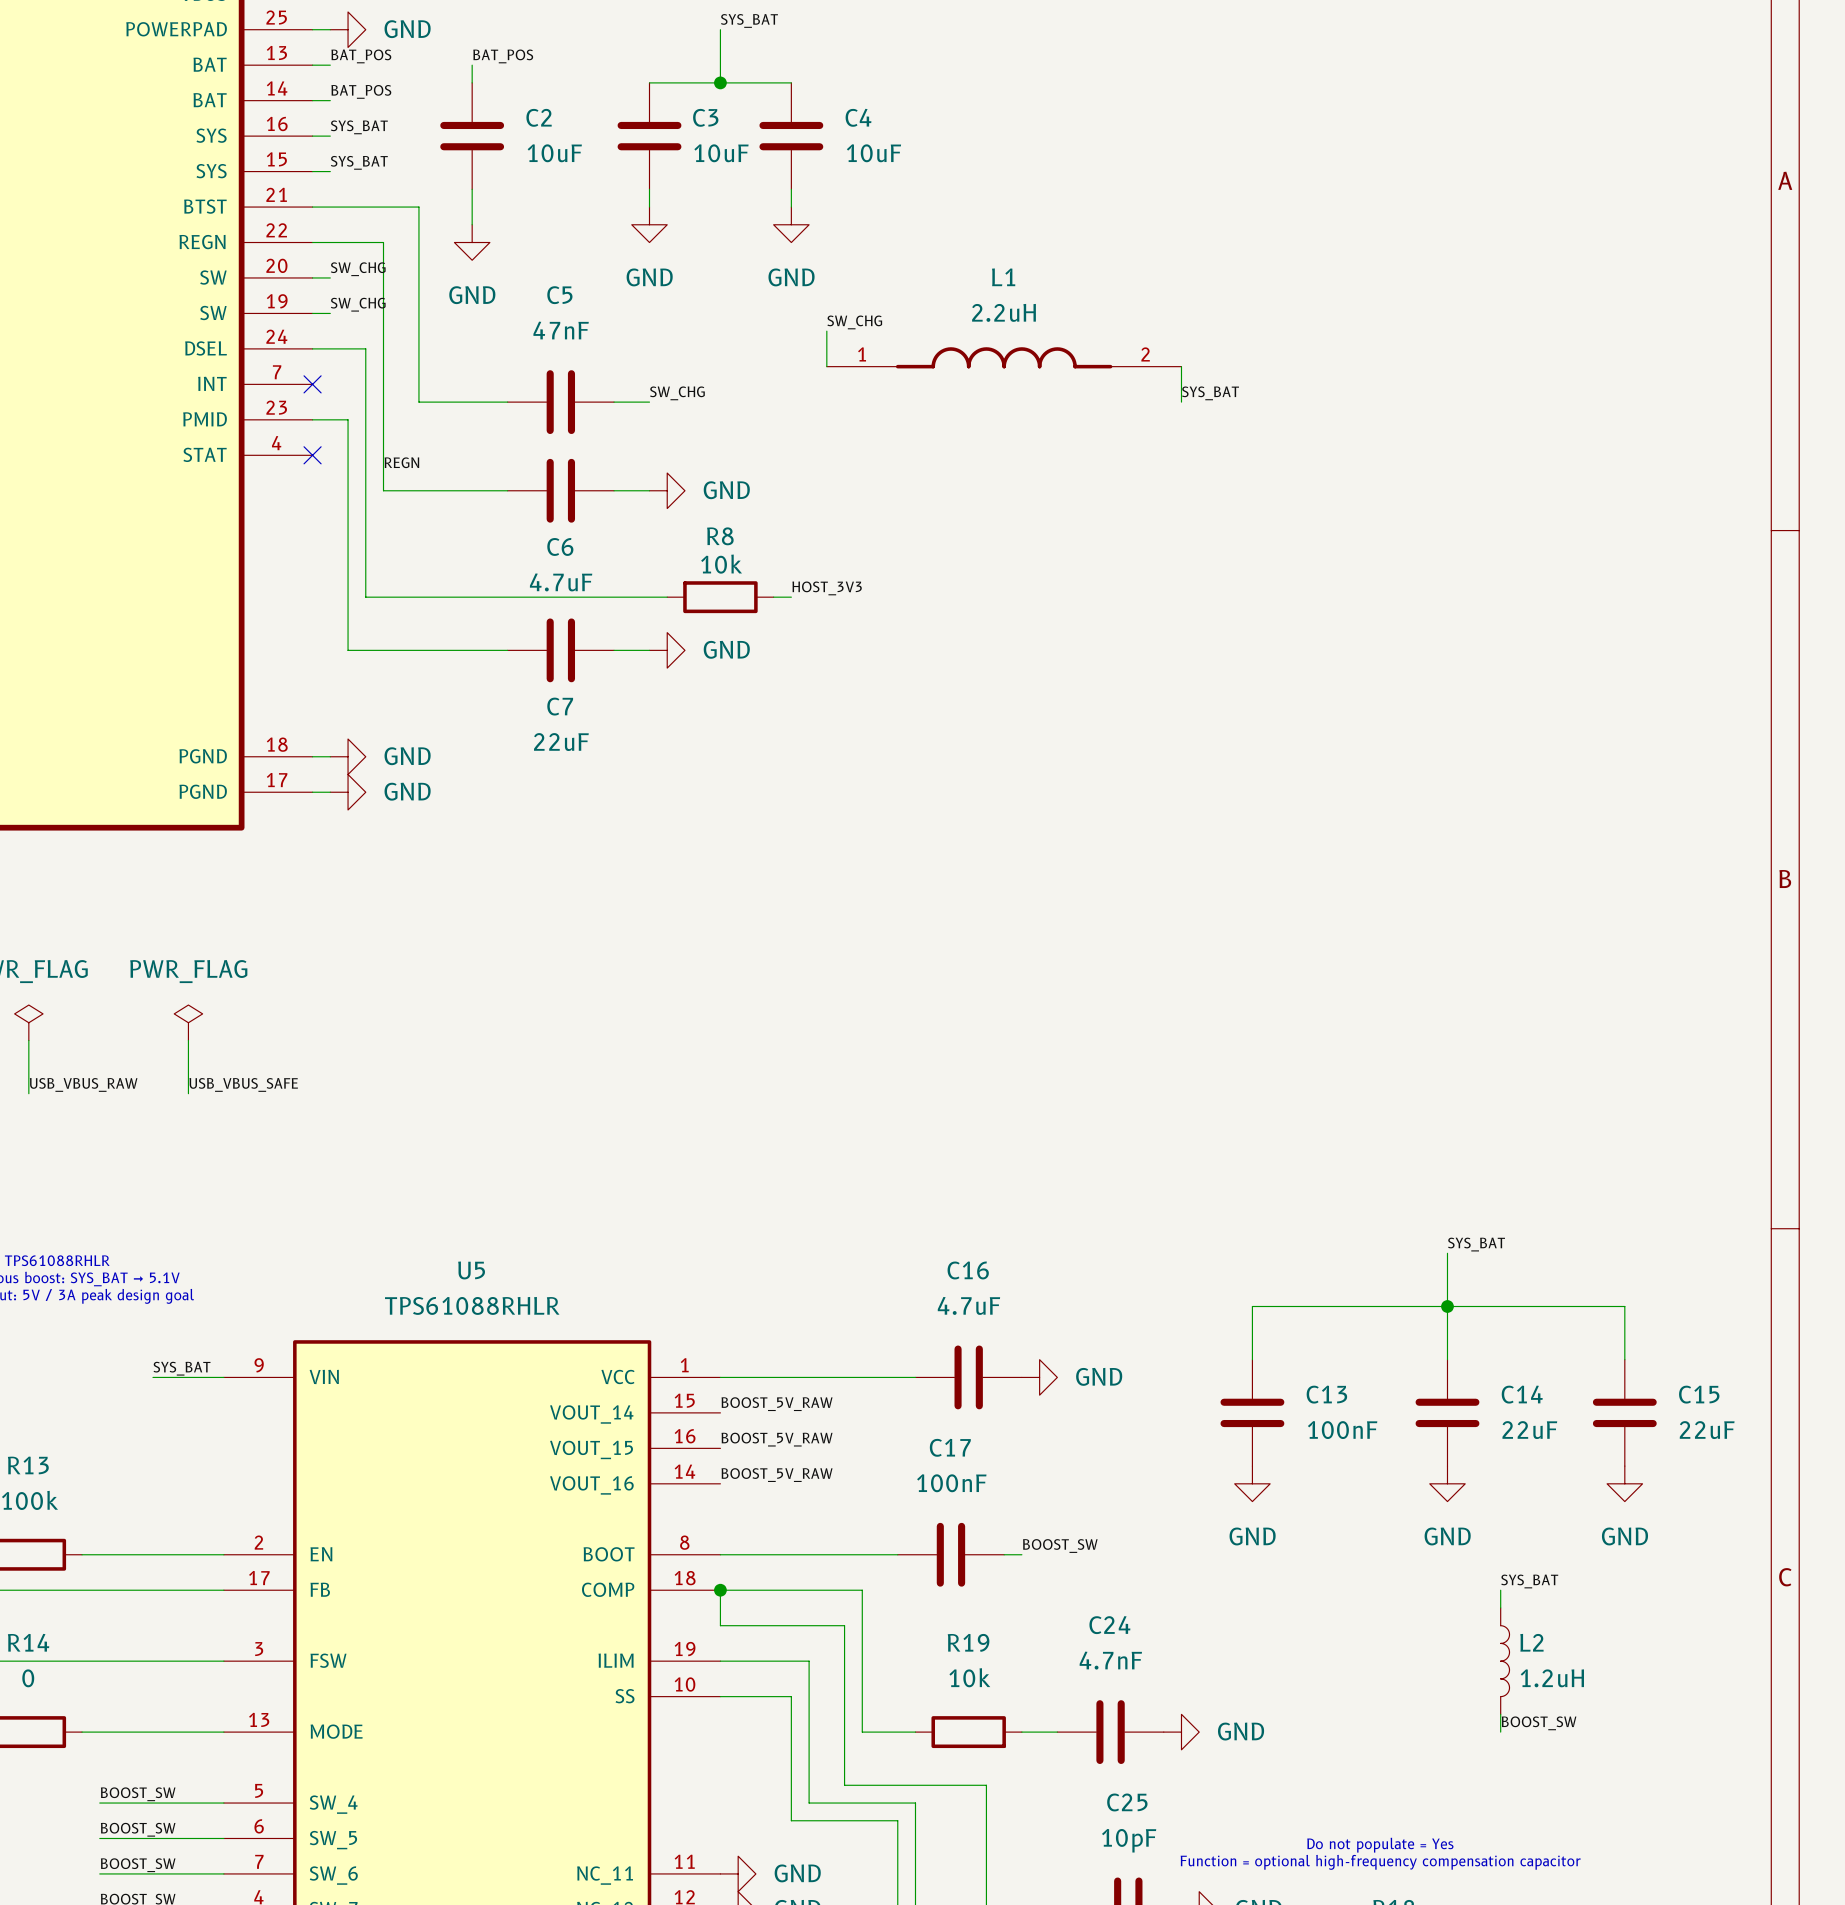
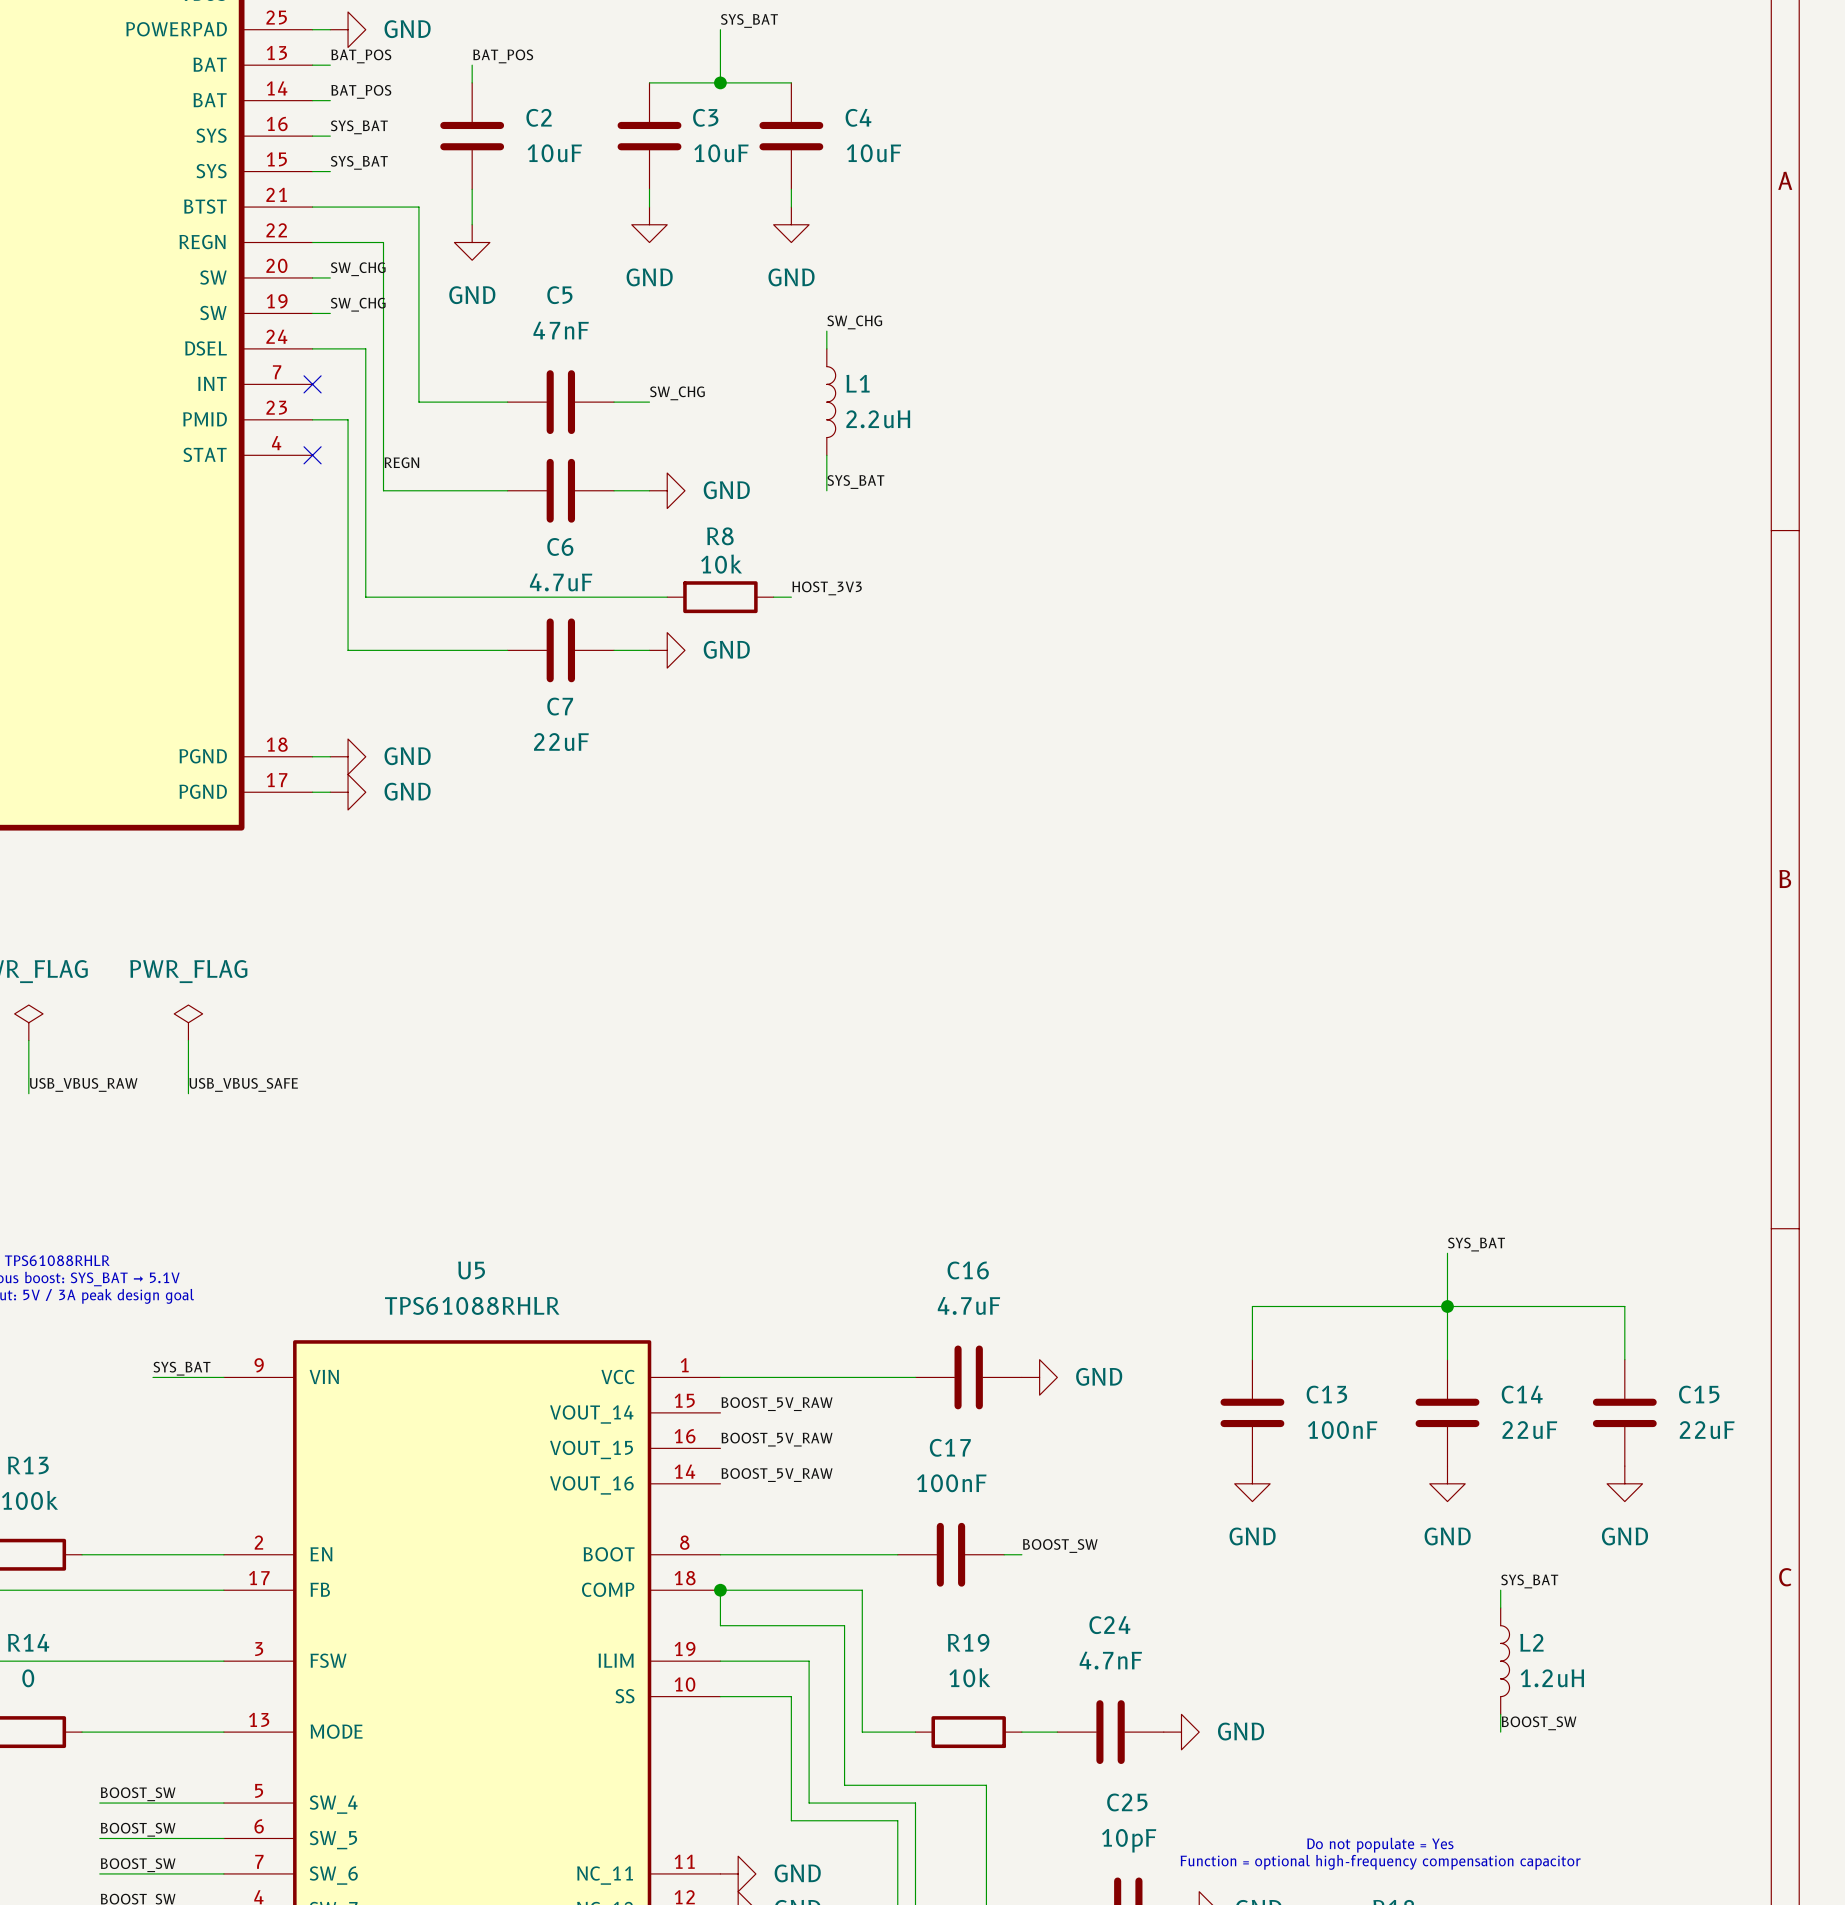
L1 name position: L1 (1003, 277) -> L1 (858, 383)
L1 value position: 2.2uH (1003, 312) -> 2.2uH (878, 419)
L1 symbol: [826, 347, 1182, 369] -> [826, 348, 836, 456]
wire: (1181, 366) (1181, 402) -> none
label: SYS_BAT (1210, 393) -> none
wire: none -> (826, 455) (826, 490)
label: none -> SYS_BAT (855, 482)

